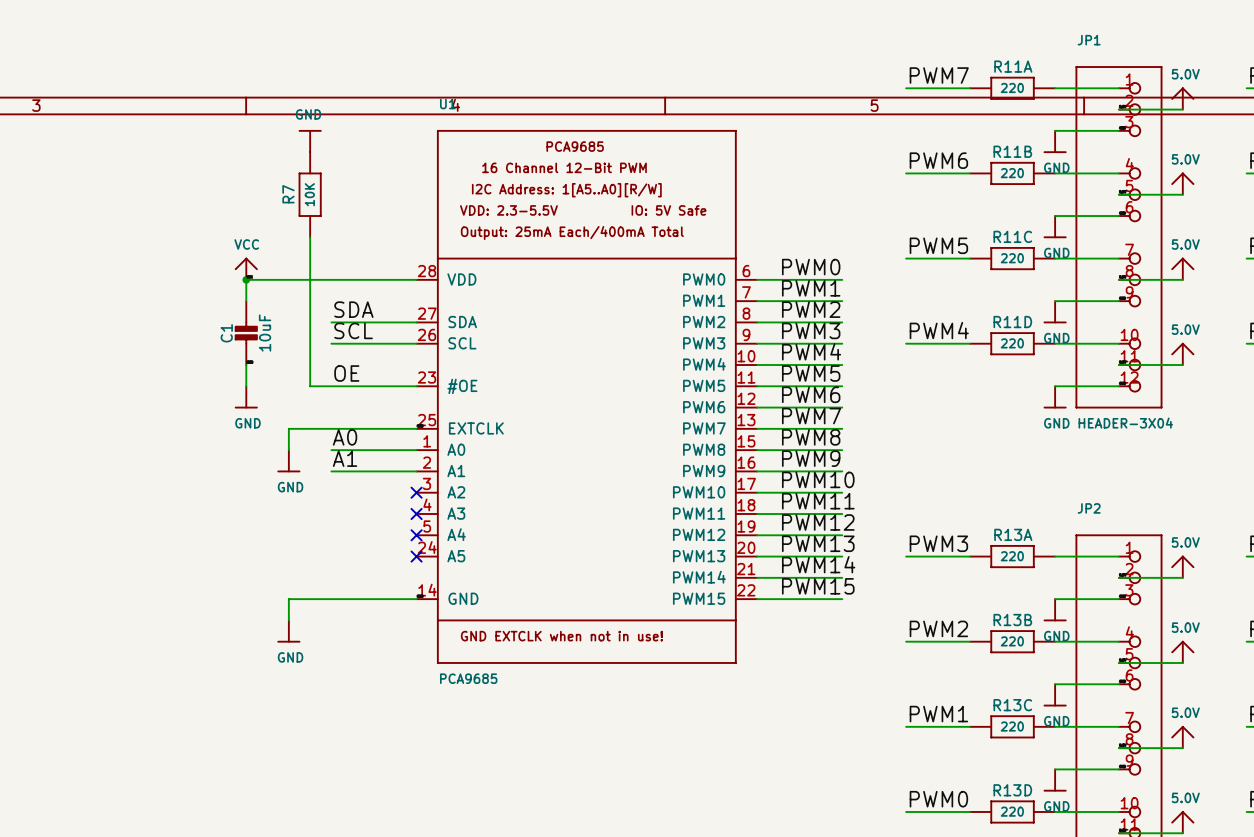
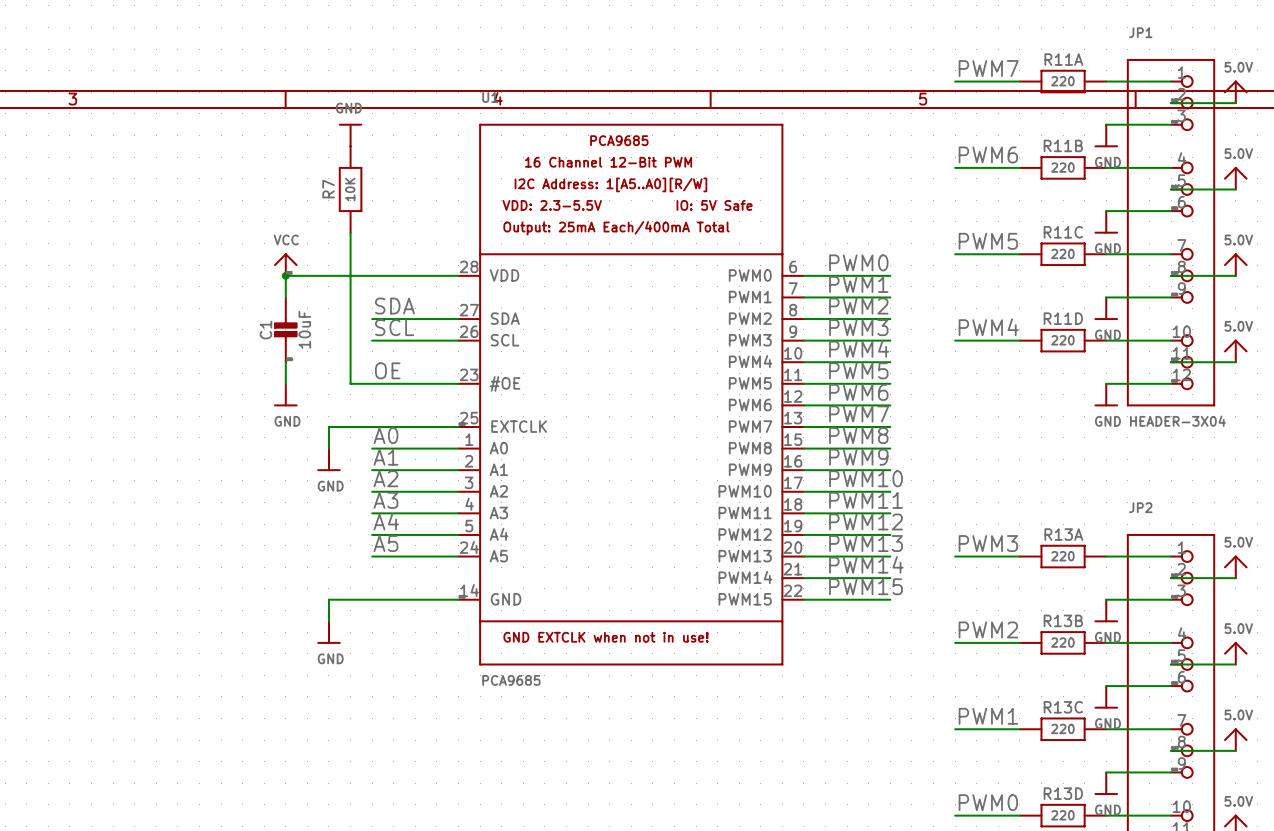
label: none -> A2 (385, 478)
wire: none -> (372, 491) (458, 491)
no-connect mark: (416, 492) -> none
label: none -> A3 (385, 500)
wire: none -> (372, 513) (458, 513)
no-connect mark: (416, 513) -> none
label: none -> A4 (386, 521)
wire: none -> (372, 534) (458, 534)
no-connect mark: (416, 535) -> none
label: none -> A5 (385, 543)
wire: none -> (372, 556) (458, 556)
no-connect mark: (416, 556) -> none

